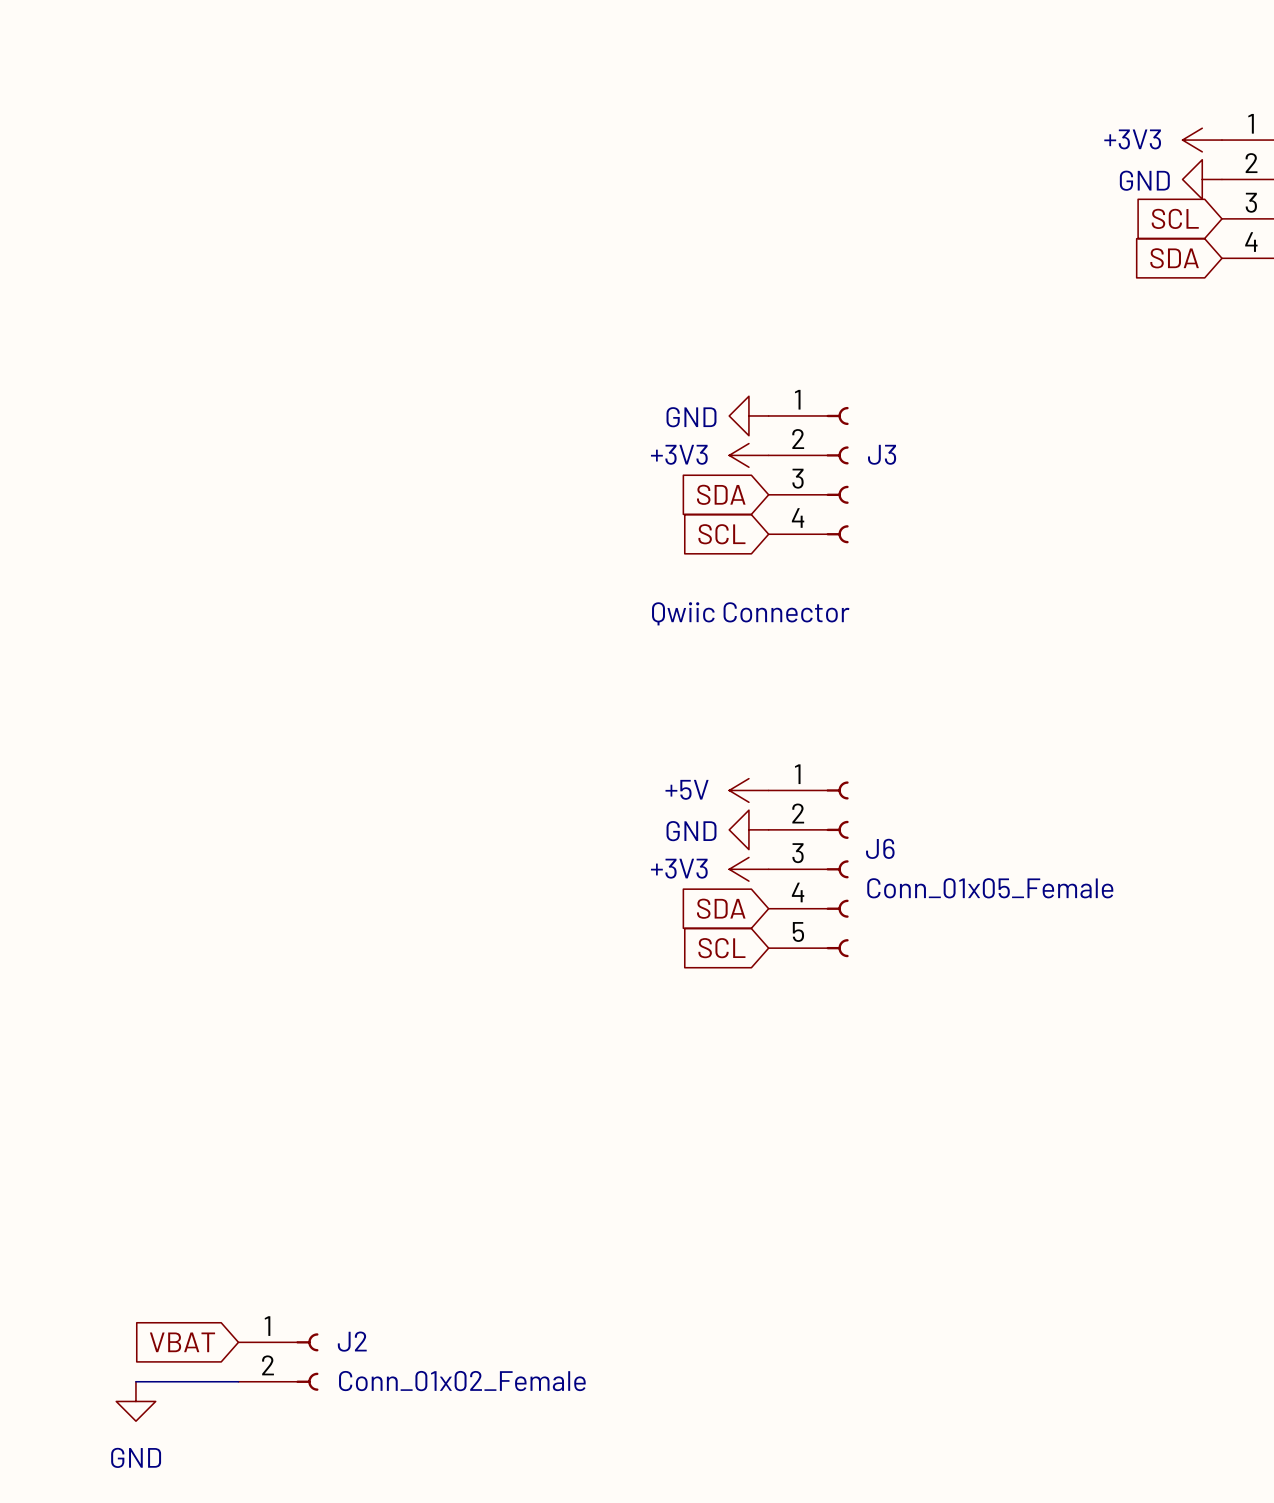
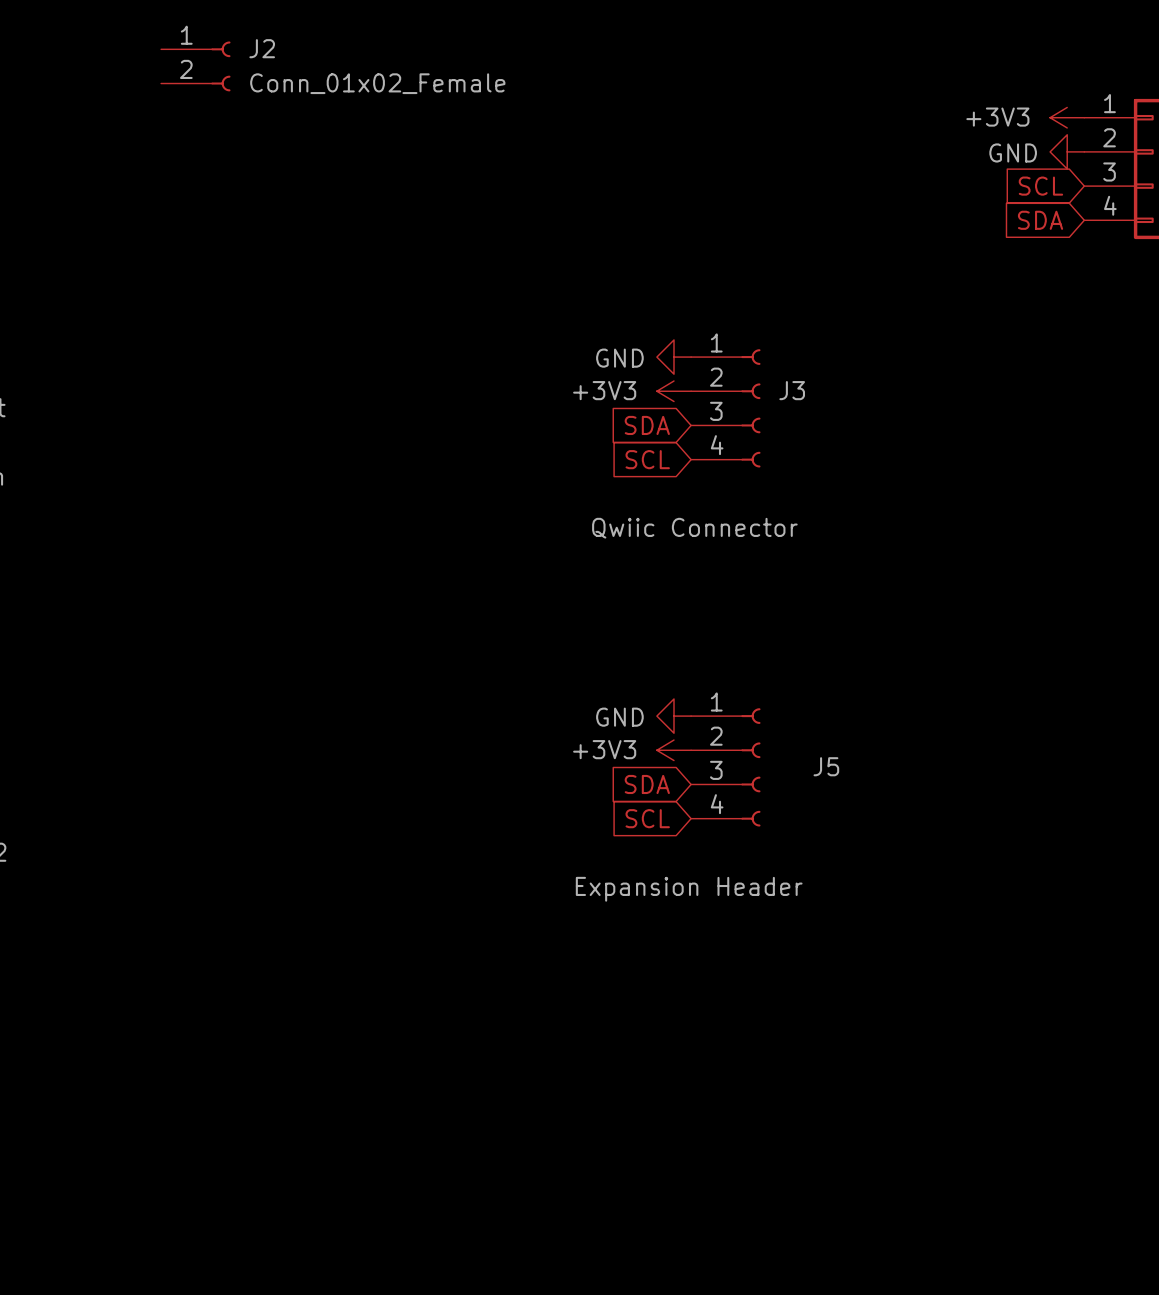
power symbol: +5V (748, 790) -> none
J6: Conn_01x05_Female (808, 869) -> none
J5: none -> Expansion Header (725, 767)
global label: VBAT (182, 1342) -> none
J2 position: (278, 1362) -> (195, 66)
wire: (135, 1381) (238, 1381) -> none
power symbol: GND (135, 1401) -> none

